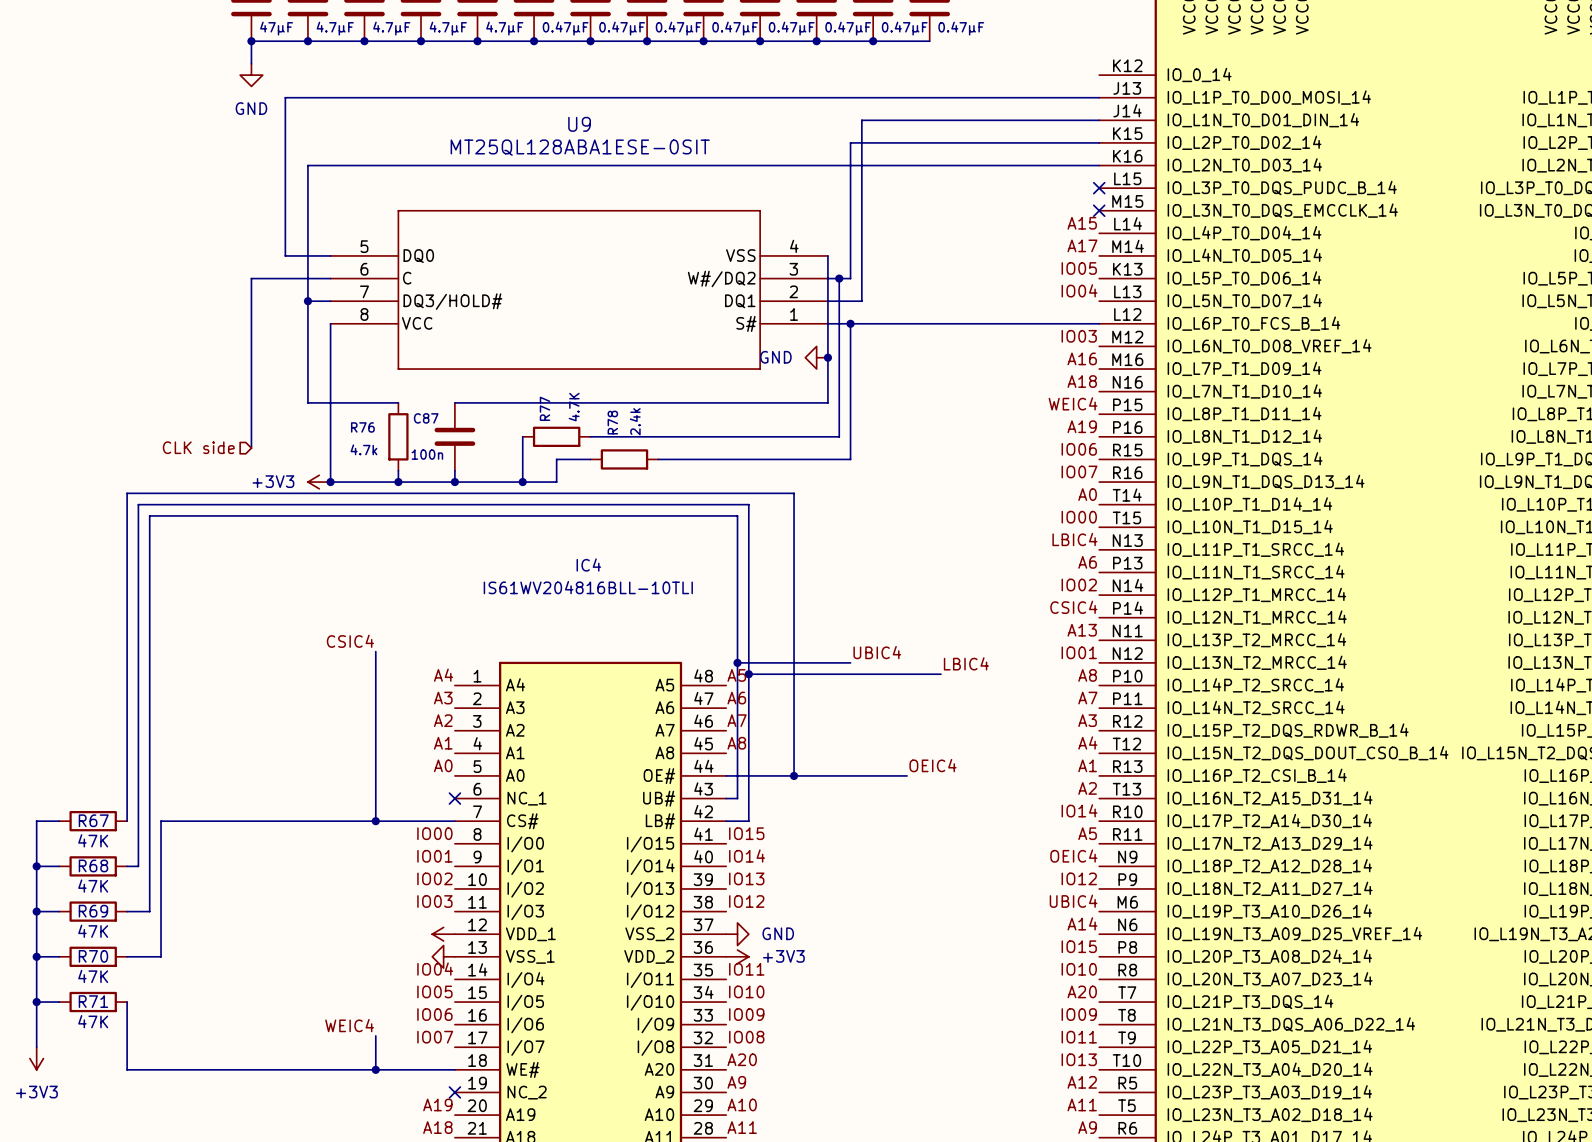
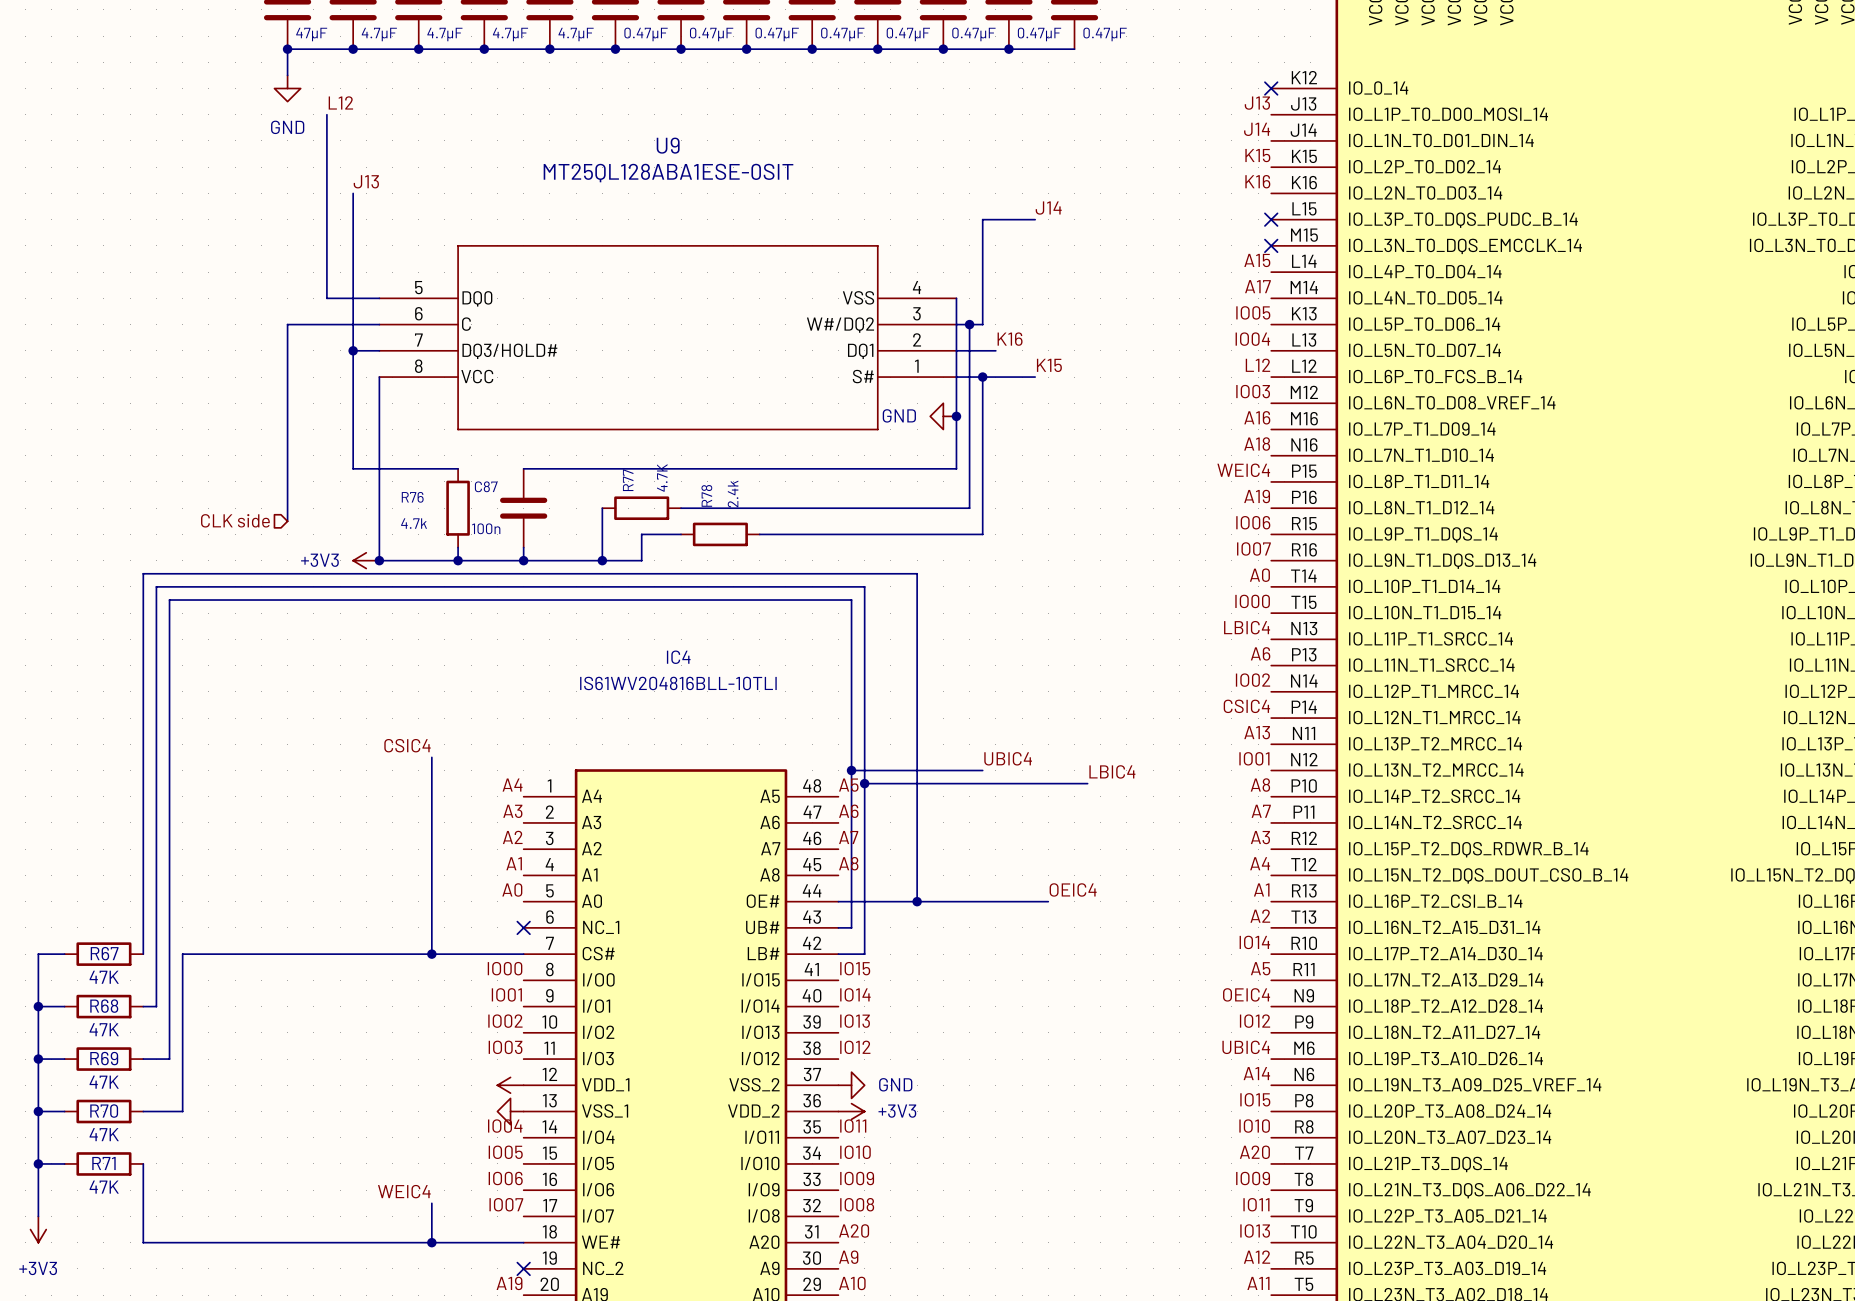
no-connect mark: none -> (1271, 88)
label: none -> L12 (340, 102)
label: none -> J13 (1257, 103)
wire: (285, 97) (1099, 97) -> none
label: none -> J14 (1257, 129)
wire: (1099, 120) (861, 120) (861, 301) -> none
label: none -> K15 (1257, 155)
wire: (1099, 142) (850, 142) (850, 188) -> (1035, 219) (982, 219)
label: none -> J13 (366, 181)
label: none -> K16 (1257, 181)
wire: (307, 165) (1099, 165) -> none
label: none -> J14 (1048, 208)
label: none -> K16 (1010, 339)
label: none -> K15 (1049, 365)
label: none -> L12 (1257, 365)
wire: (895, 323) (1099, 323) -> none

